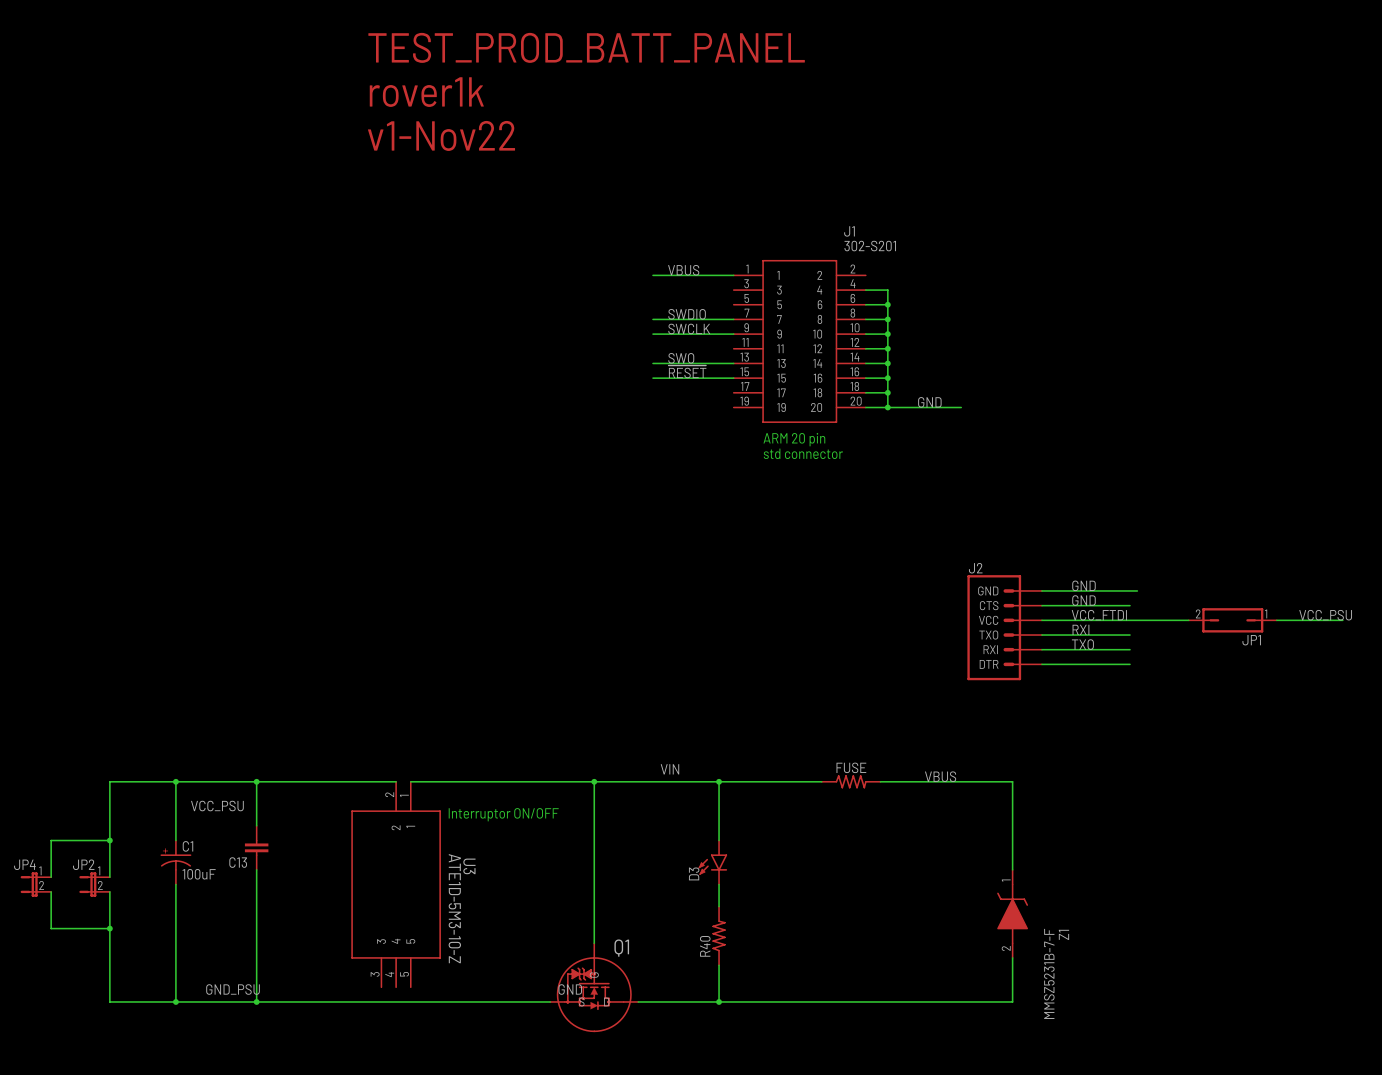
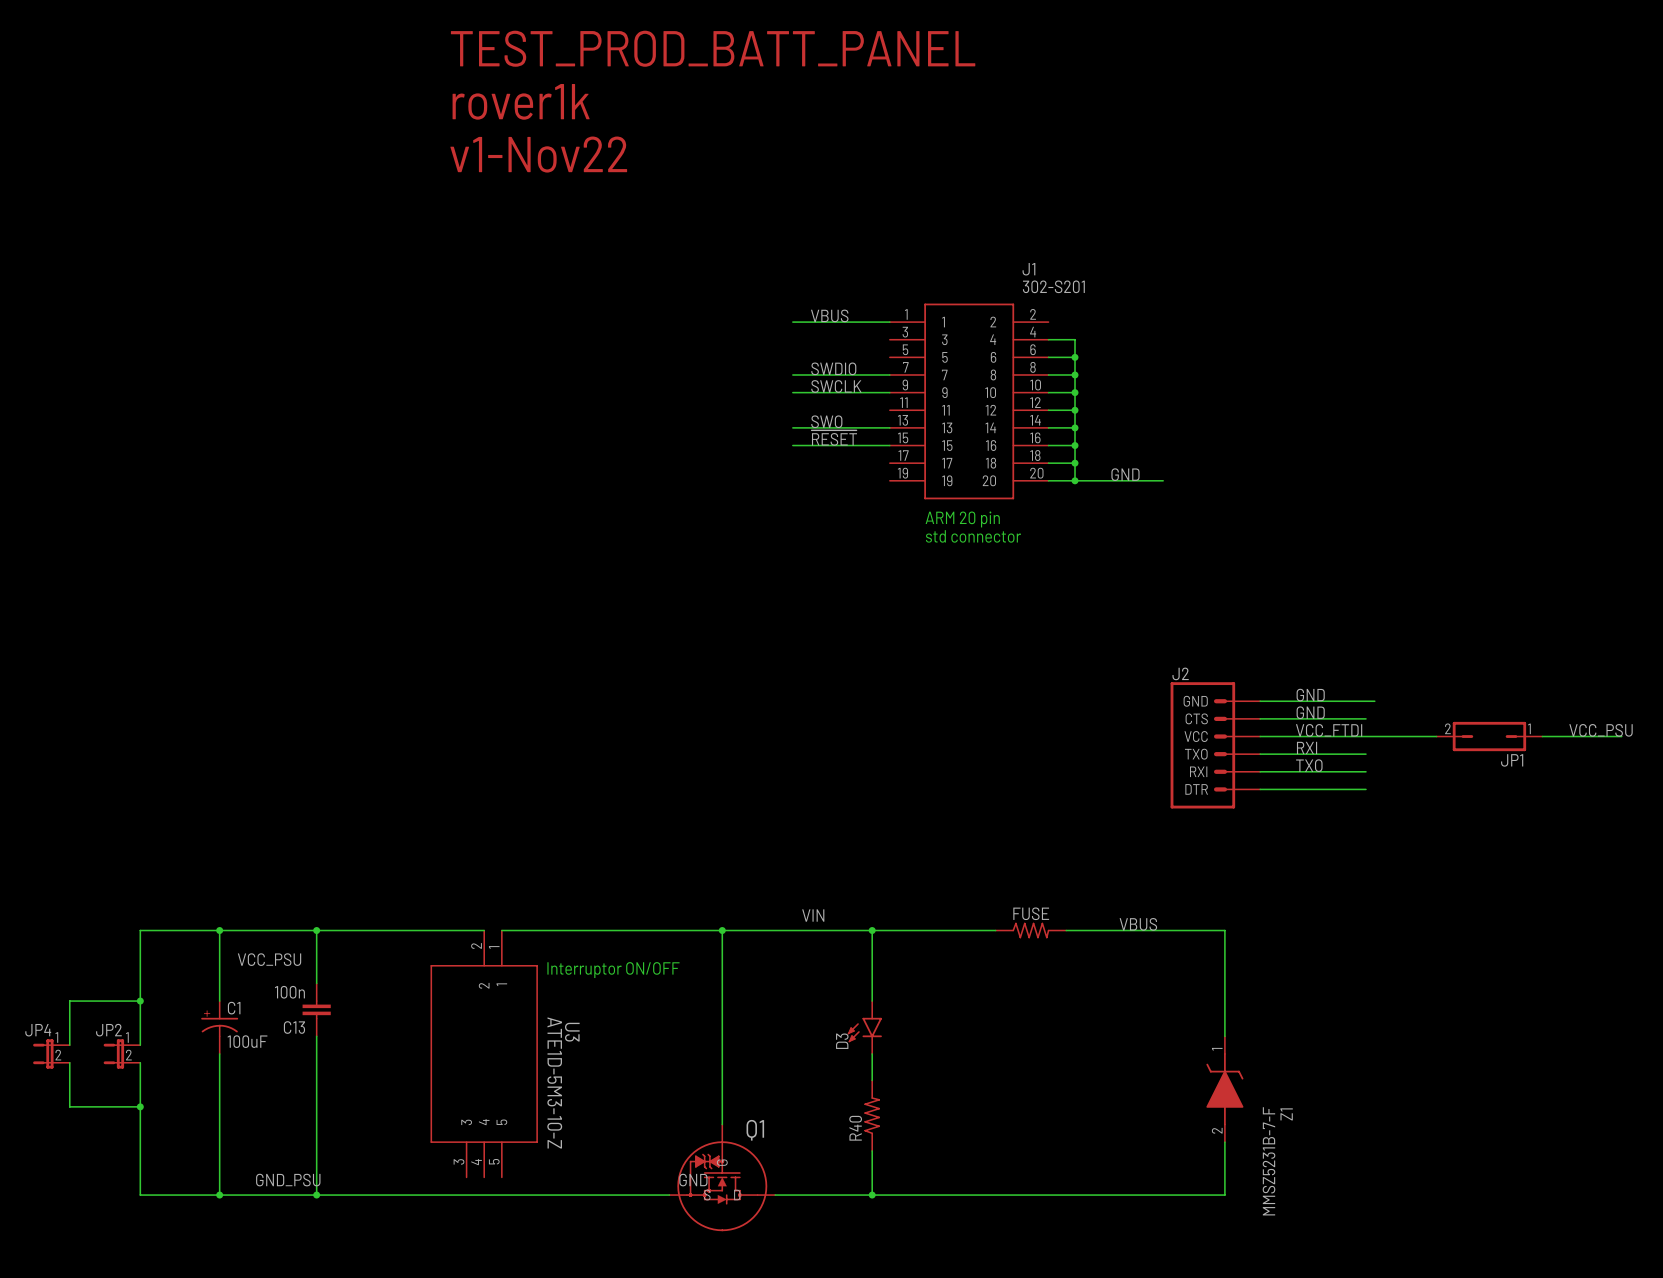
C13 value: none -> 100n (289, 992)

